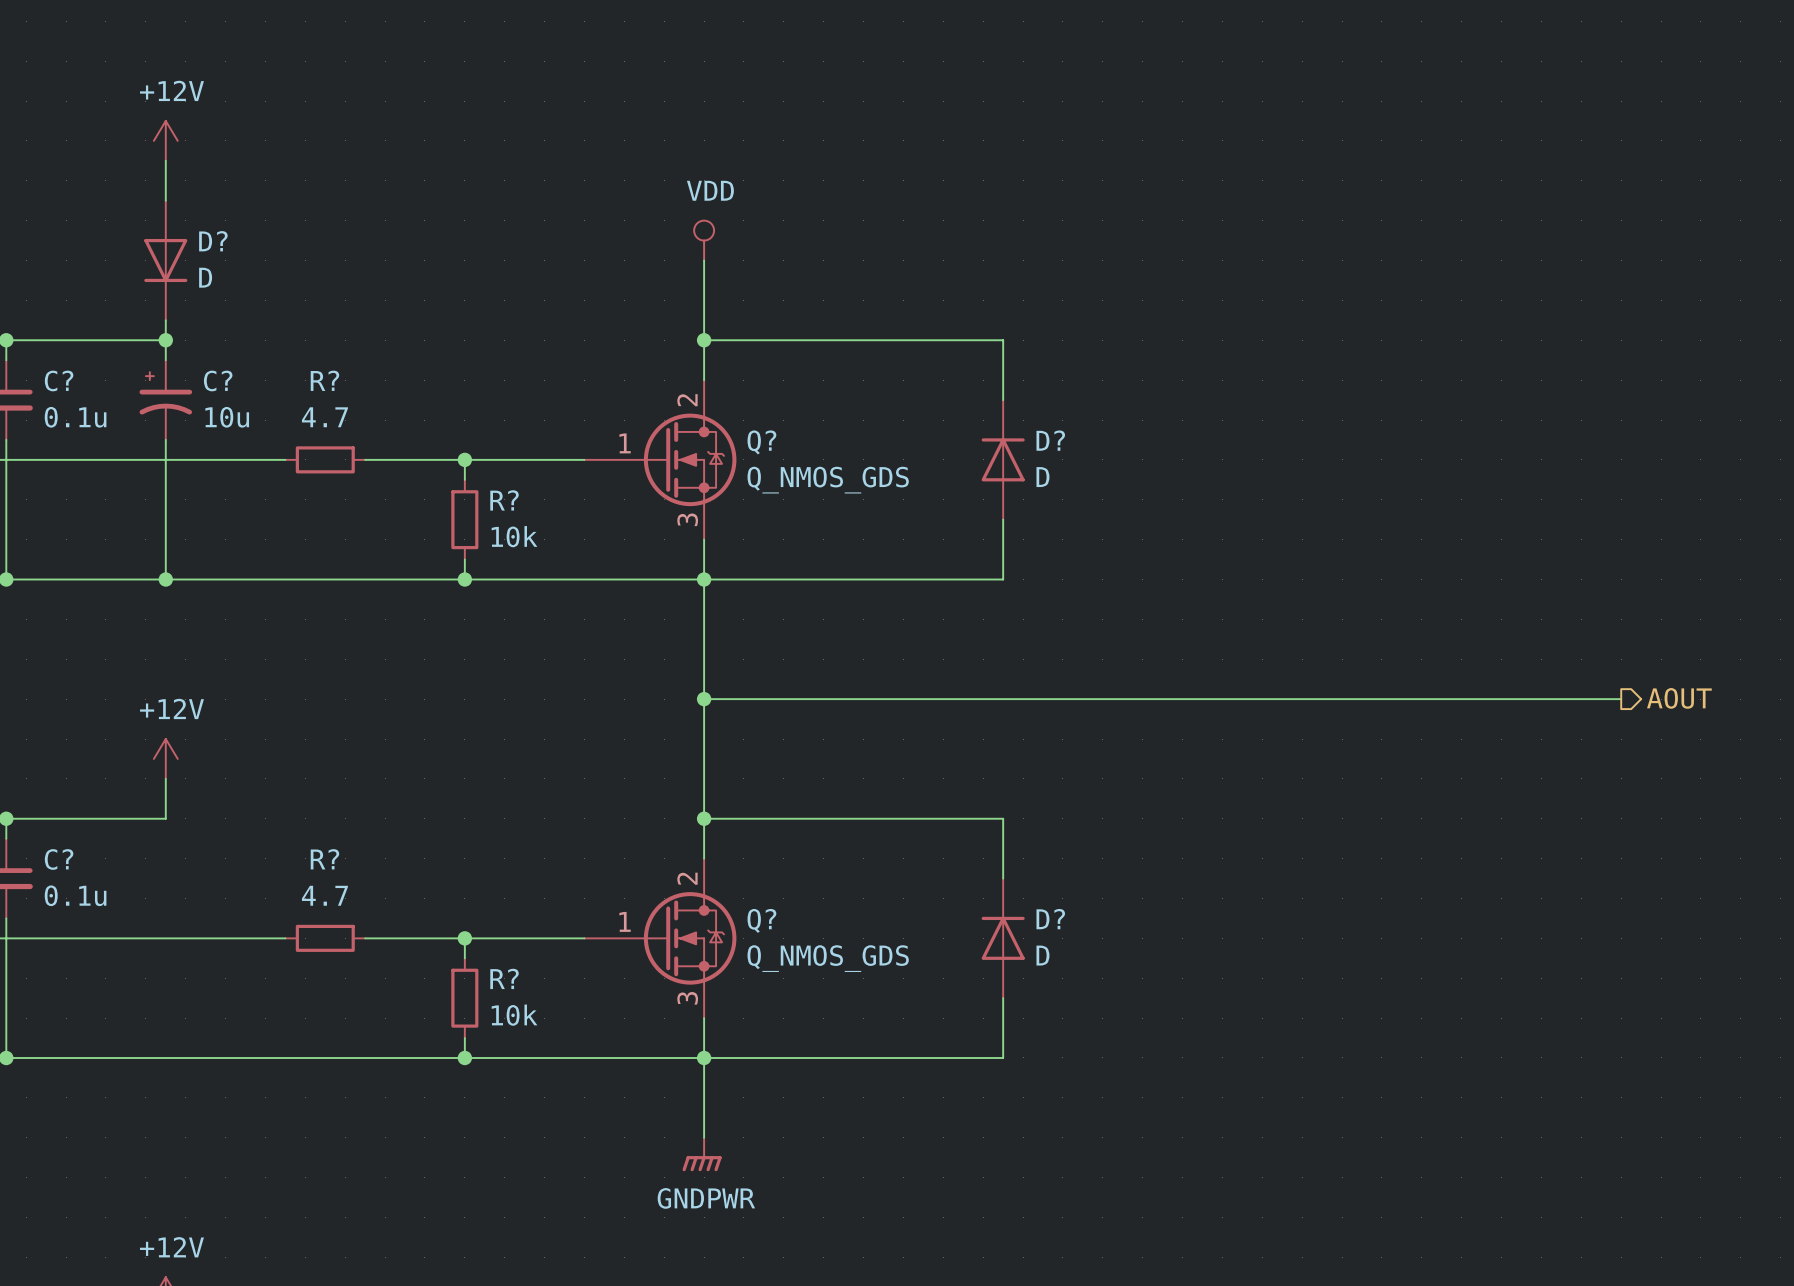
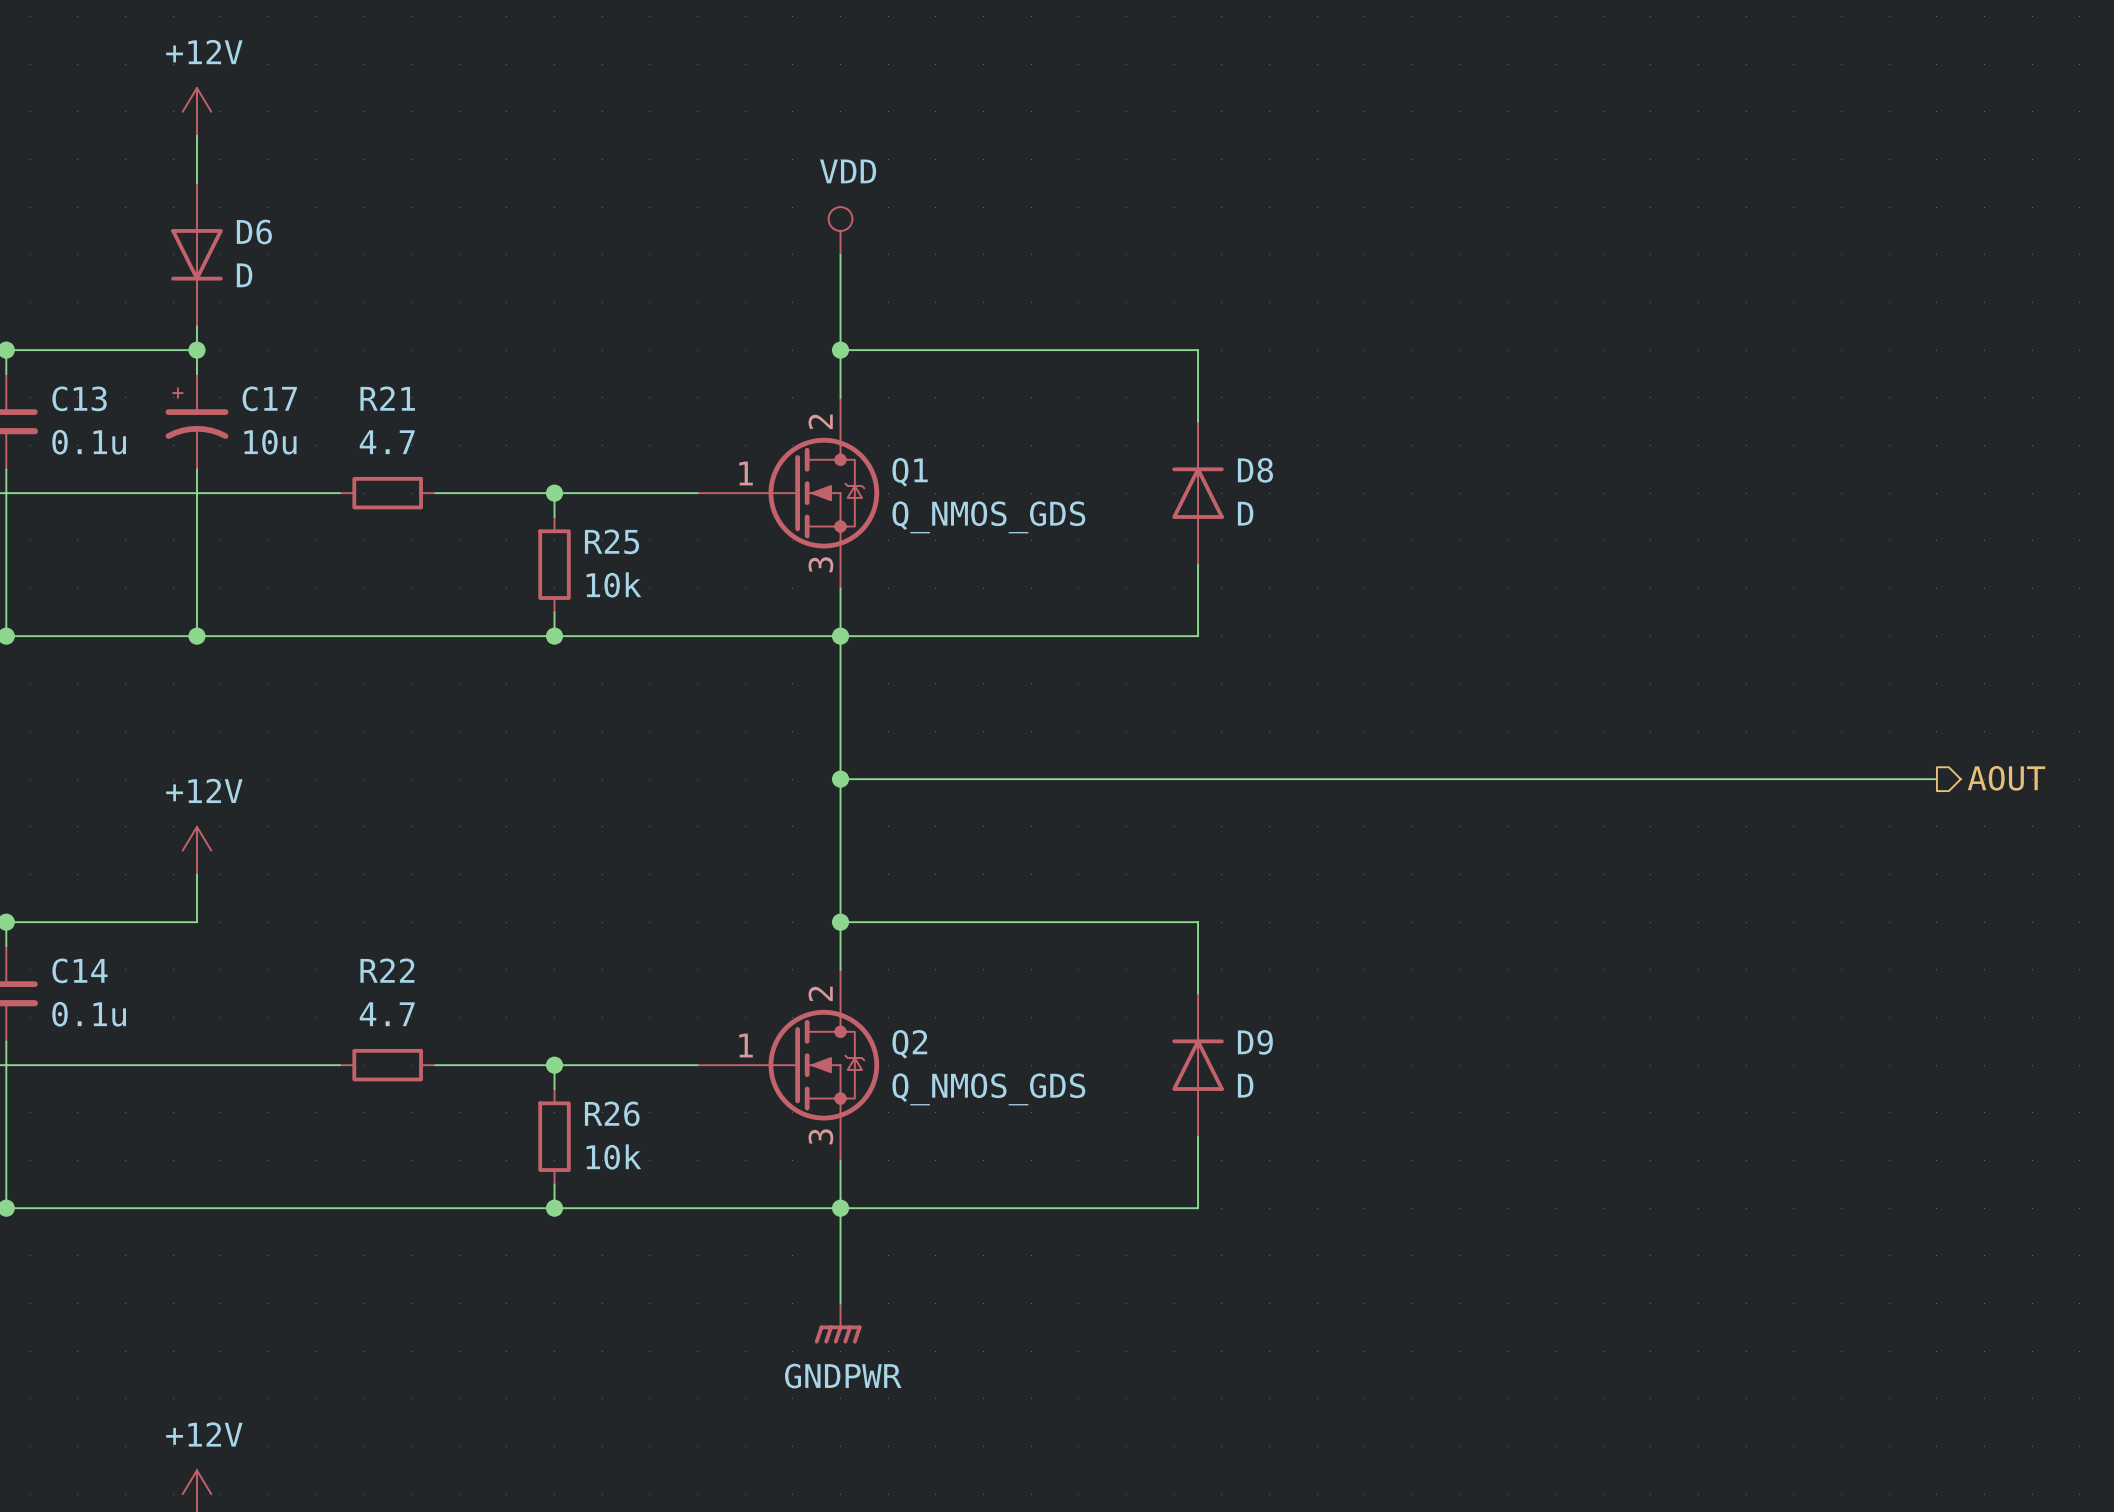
D? name: D? (213, 241) -> D6 (254, 231)
C? name: C? (59, 380) -> C13 (79, 398)
C? name: C? (218, 380) -> C17 (269, 398)
R? name: R? (324, 380) -> R21 (387, 398)
D? name: D? (1050, 440) -> D8 (1255, 470)
Q? name: Q? (761, 442) -> Q1 (910, 472)
R? name: R? (504, 500) -> R25 (611, 541)
C? name: C? (59, 859) -> C14 (80, 970)
R? name: R? (324, 859) -> R22 (387, 970)
D? name: D? (1050, 919) -> D9 (1255, 1042)
Q? name: Q? (761, 920) -> Q2 (909, 1044)
R? name: R? (504, 978) -> R26 (612, 1113)

